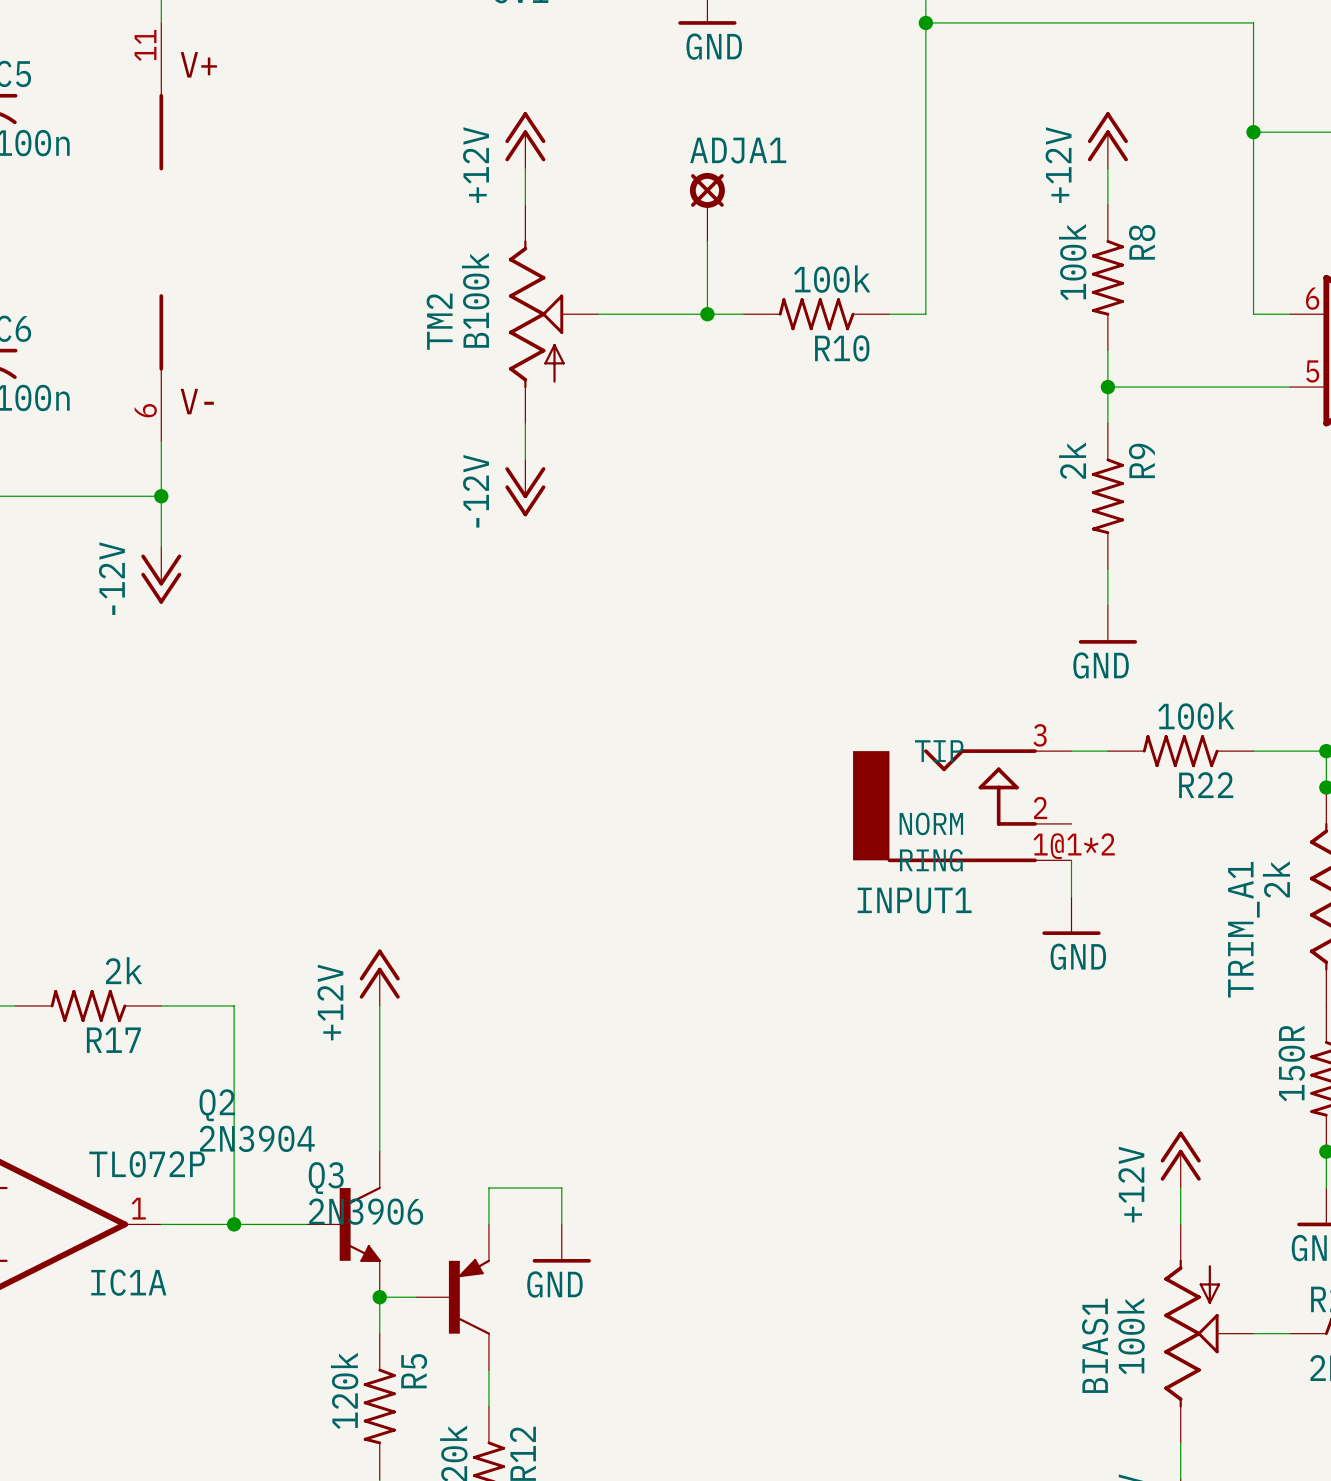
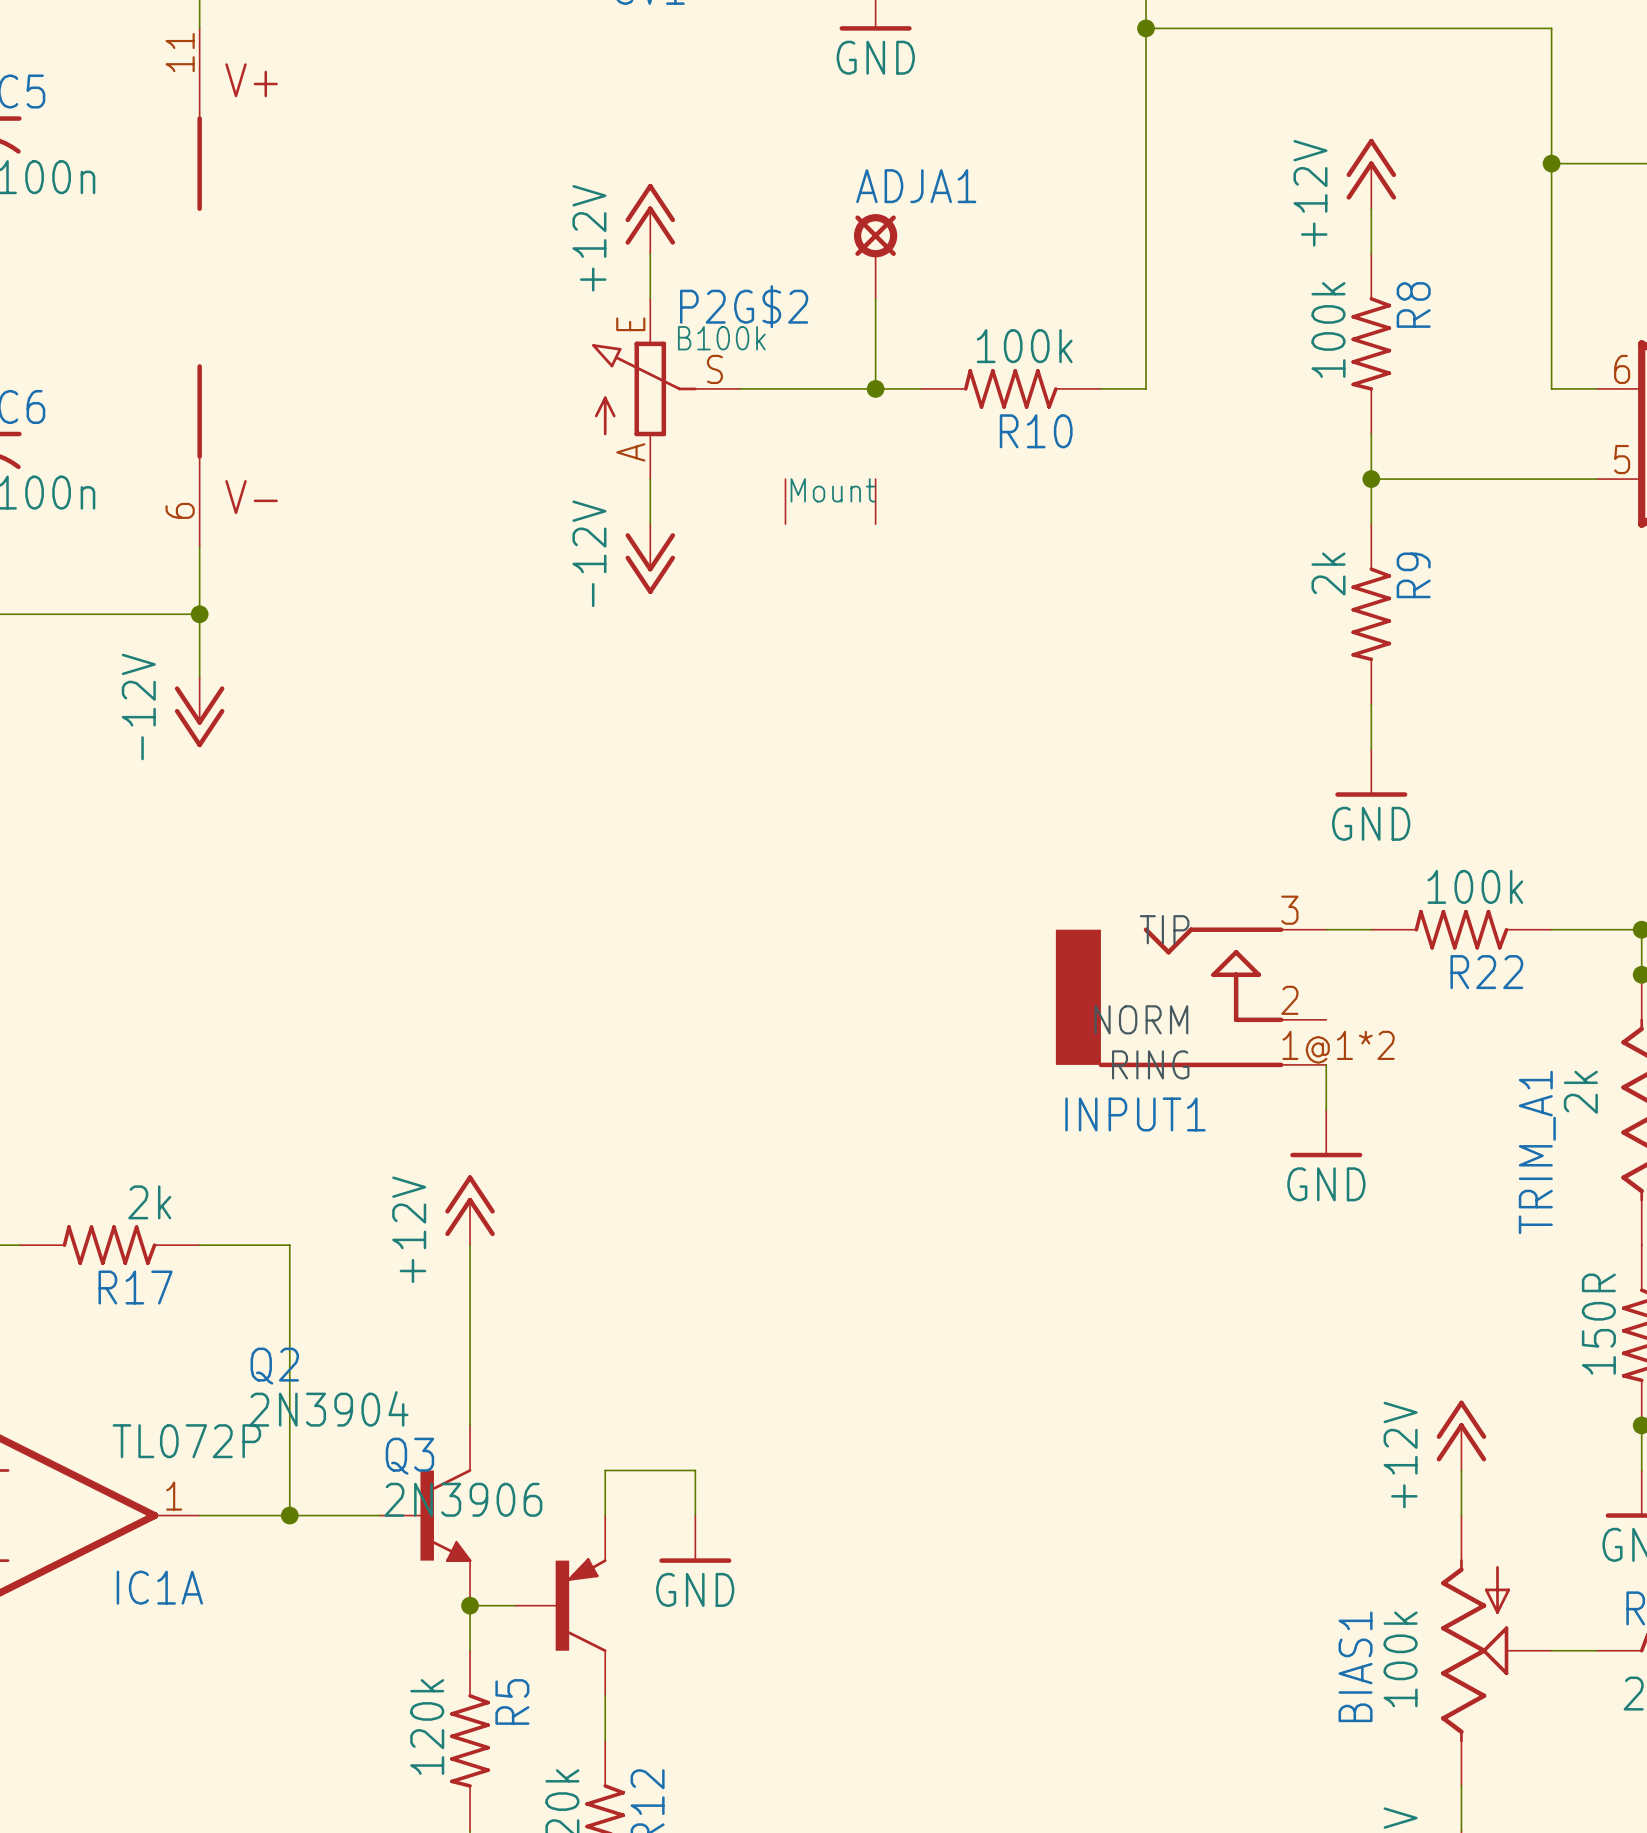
power symbol position: +12V (525, 140) -> +12V (650, 218)
P2G$2: none -> B100k (666, 388)
TM2: B100k (553, 314) -> none
part: none -> (830, 501)
power symbol position: -12V (525, 488) -> -12V (650, 559)

